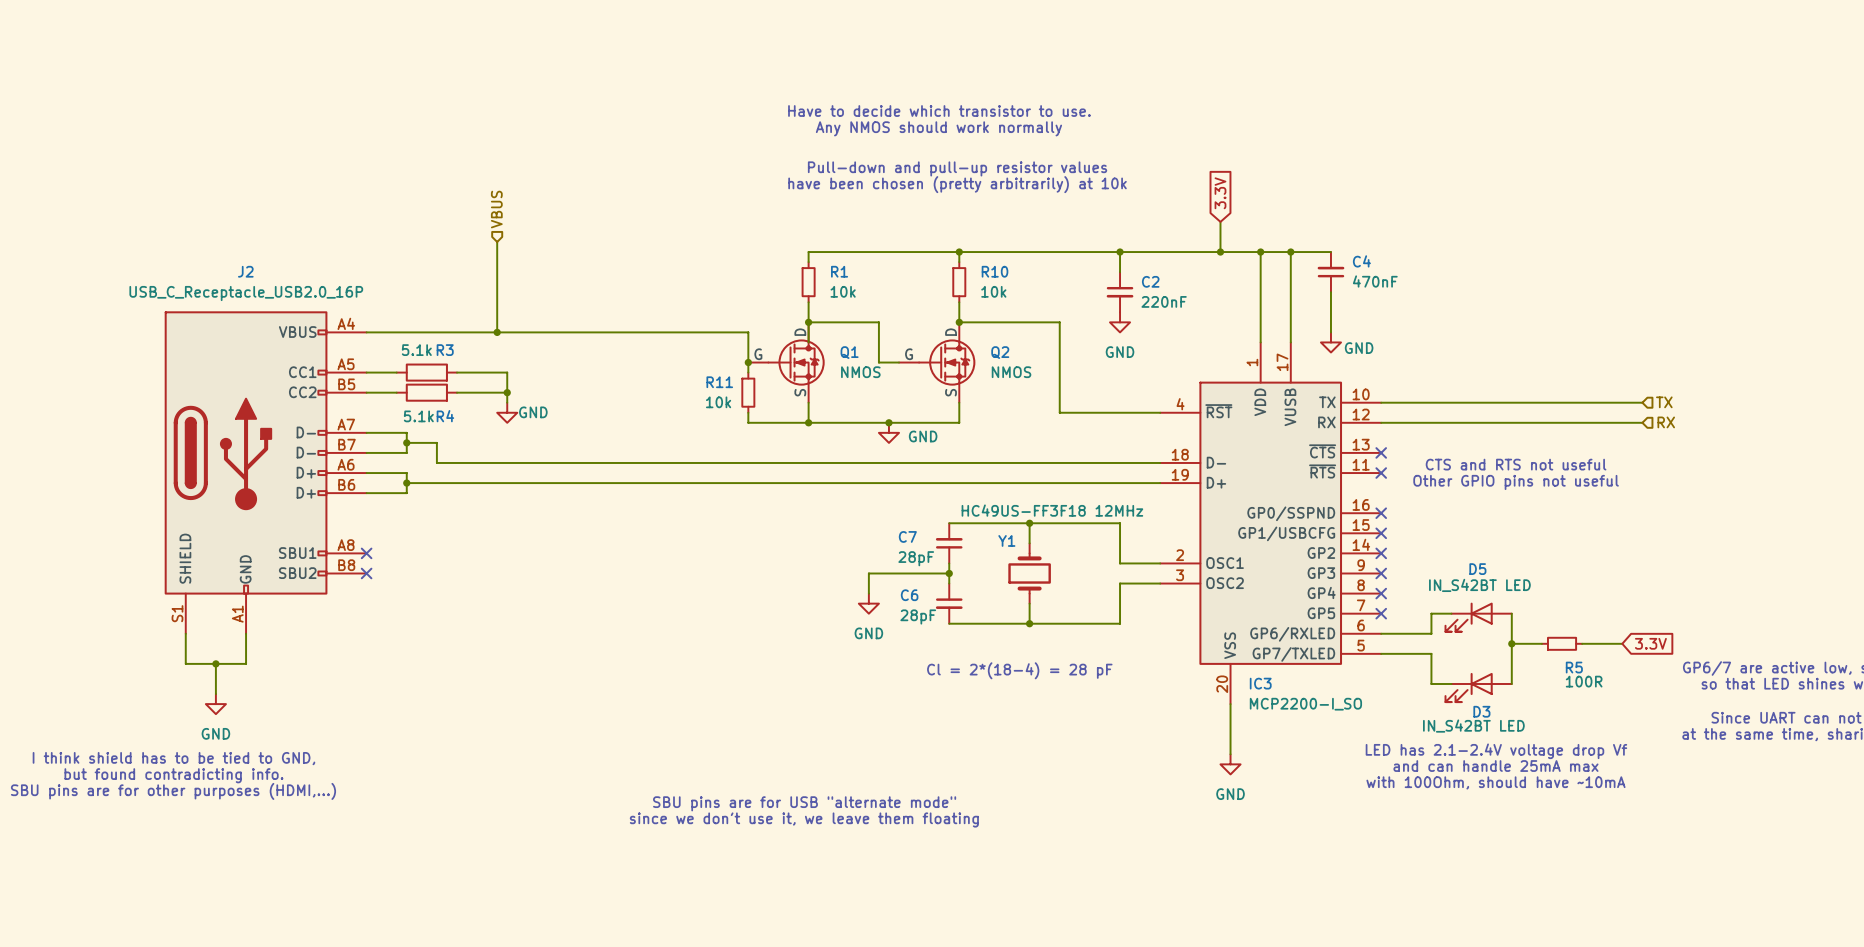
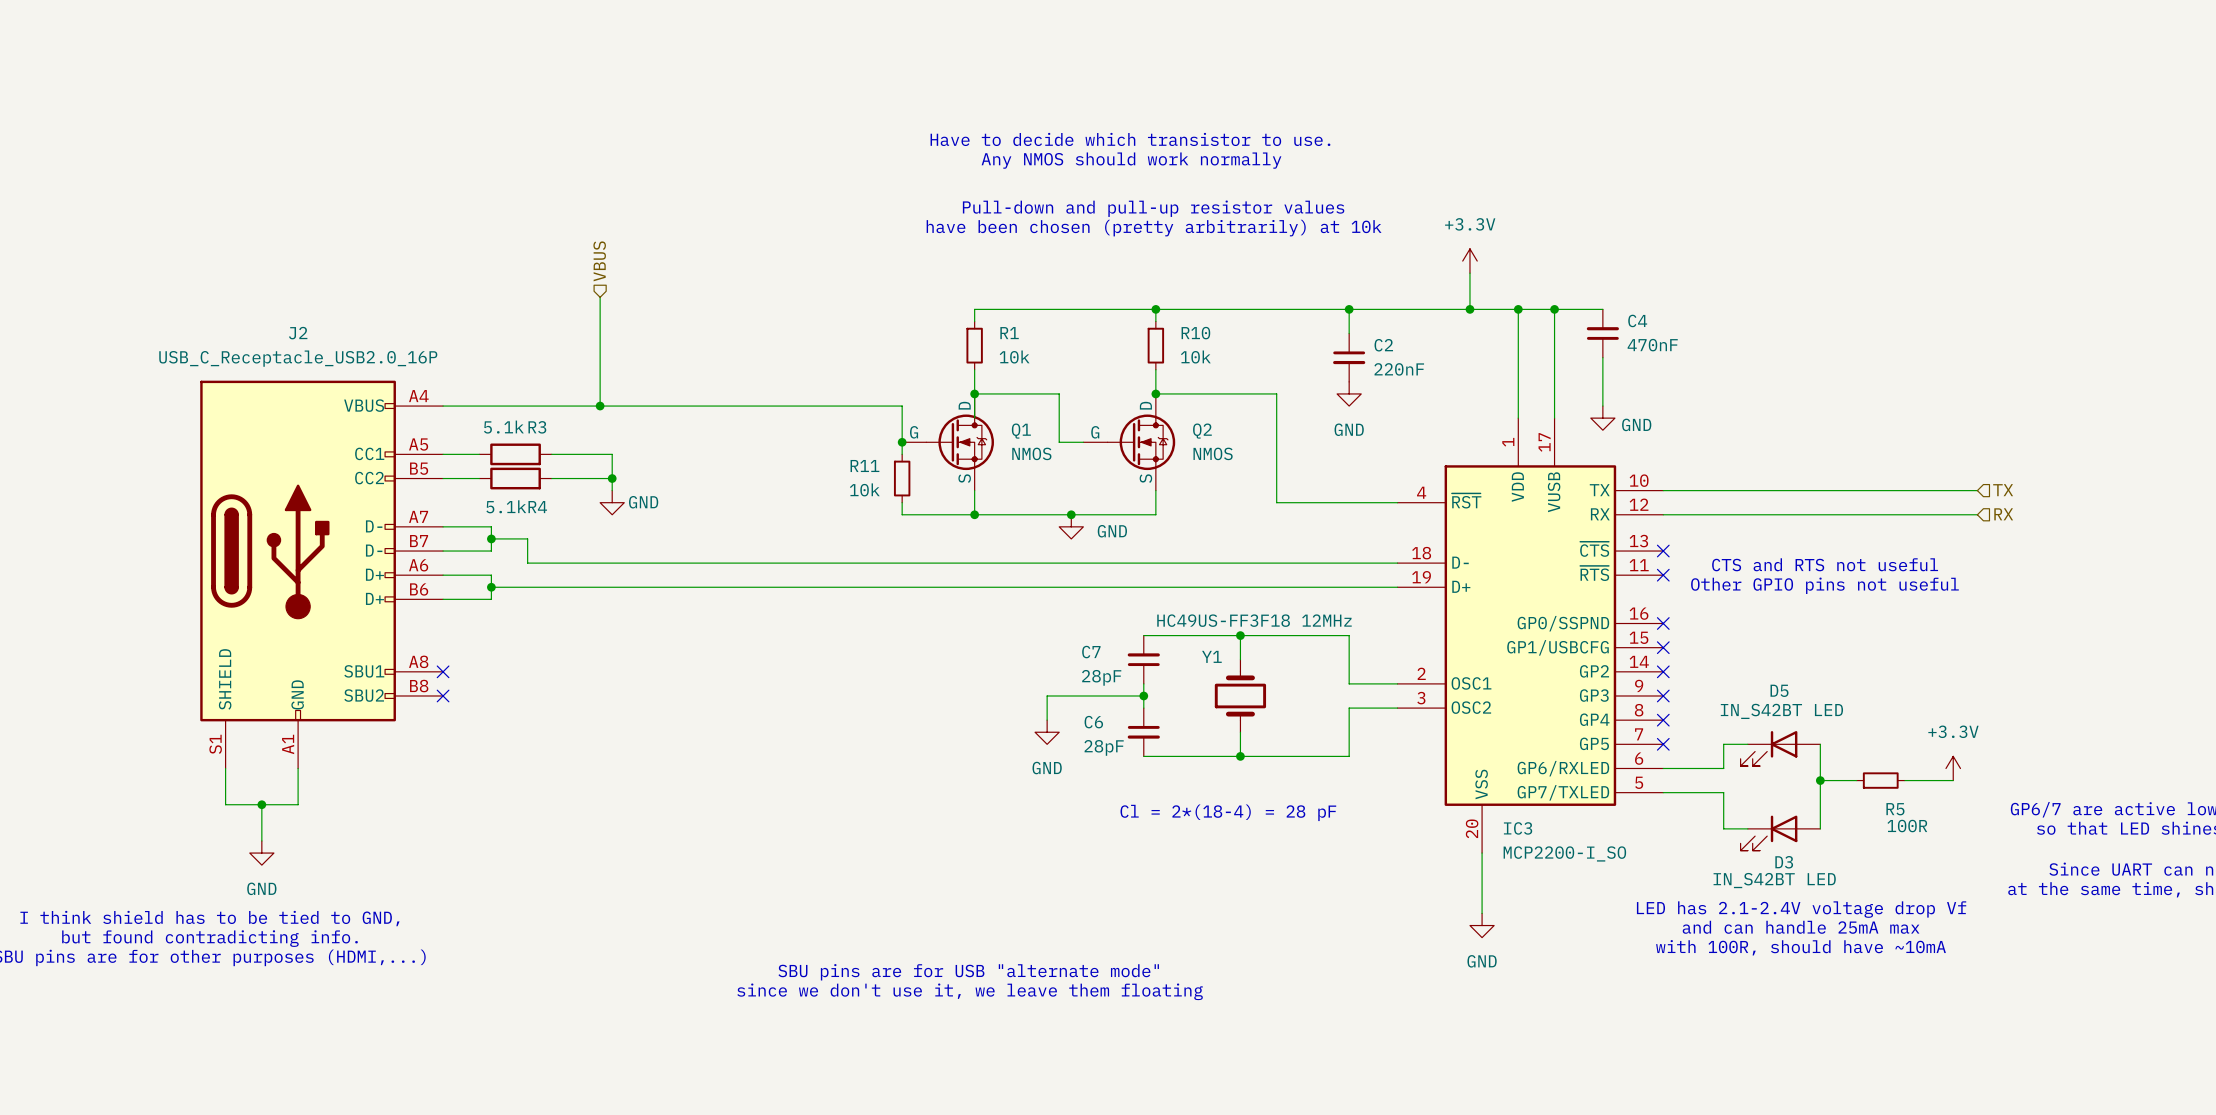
global label: 3.3V (1220, 193) -> none
power symbol: none -> +3.3V (1469, 261)
power symbol: none -> +3.3V (1953, 768)
global label: 3.3V (1650, 643) -> none
text: with 100Ohm, should have ~10mA (1495, 782) -> with 100R, should have ~10mA (1801, 947)

